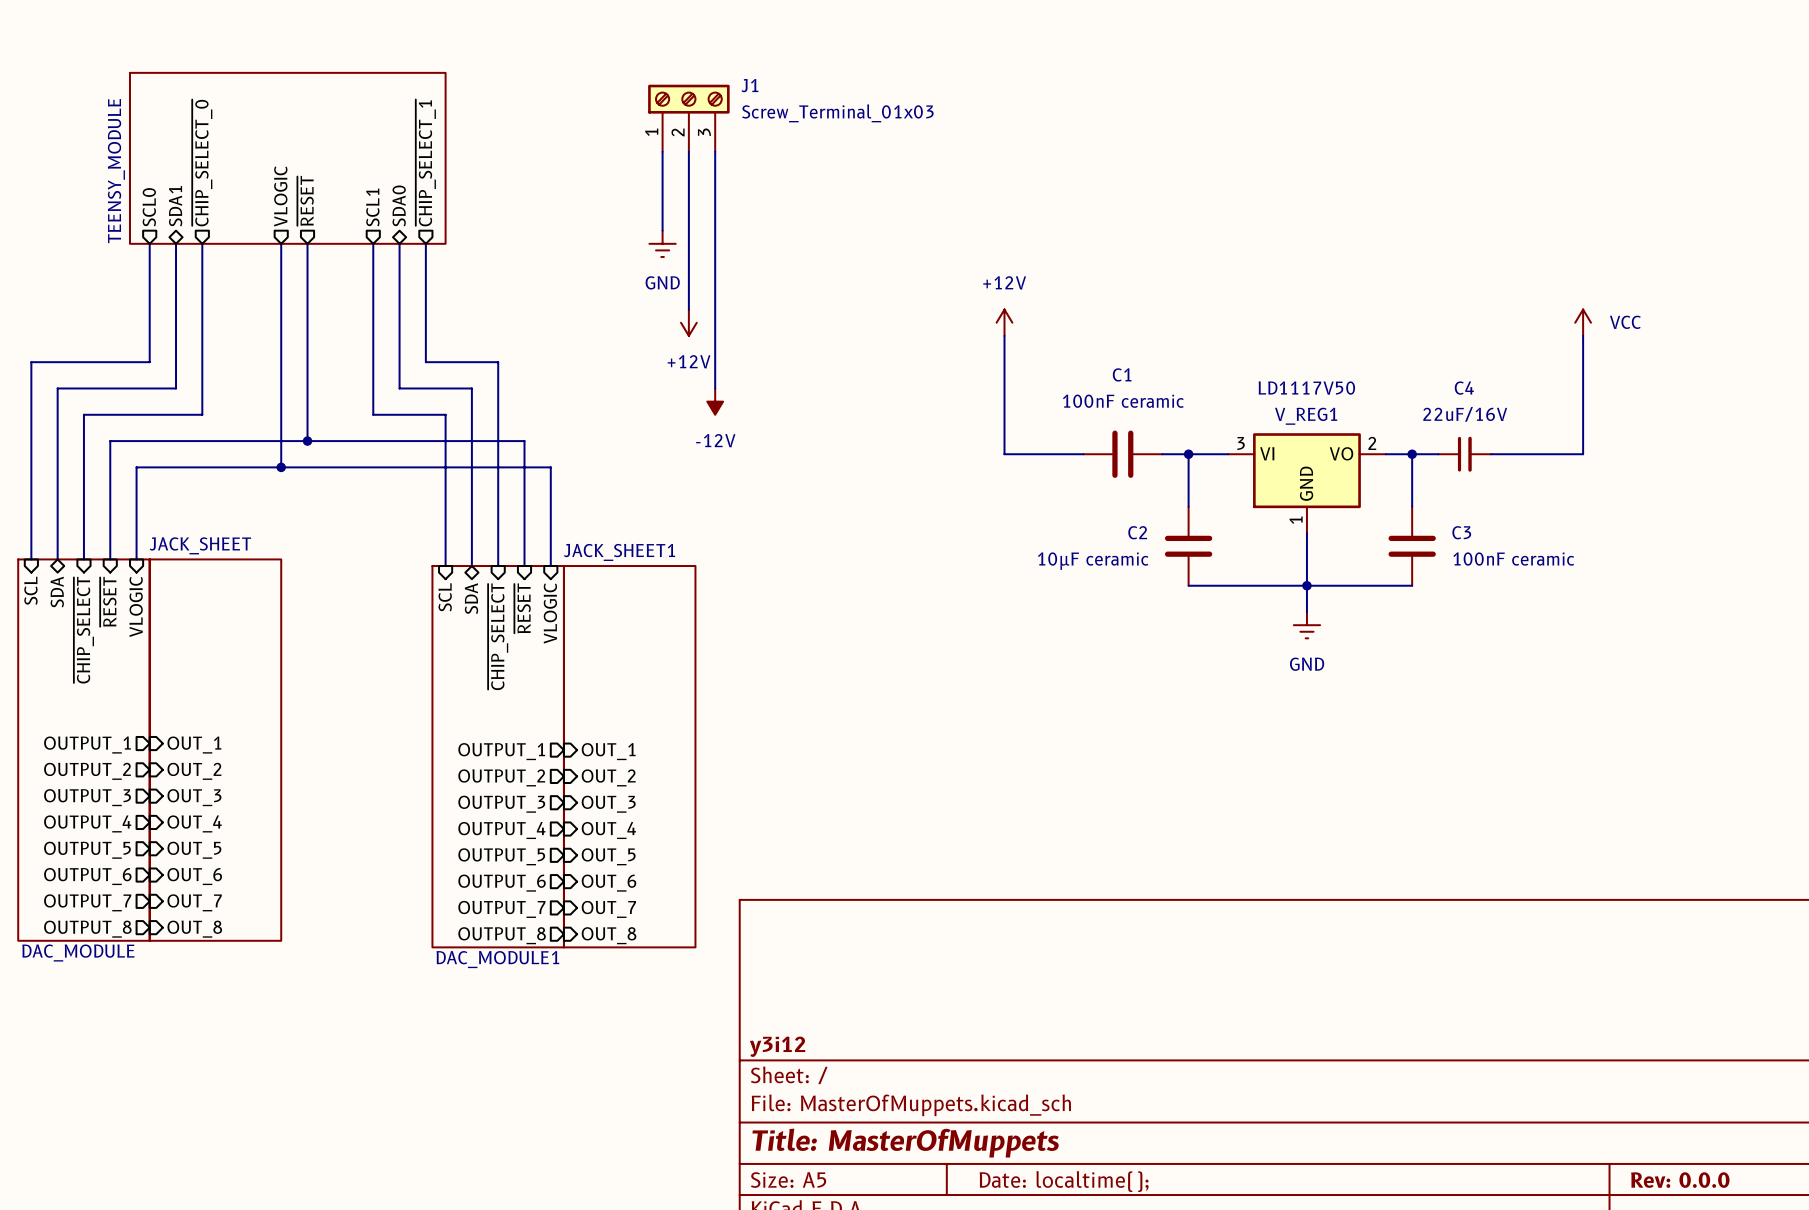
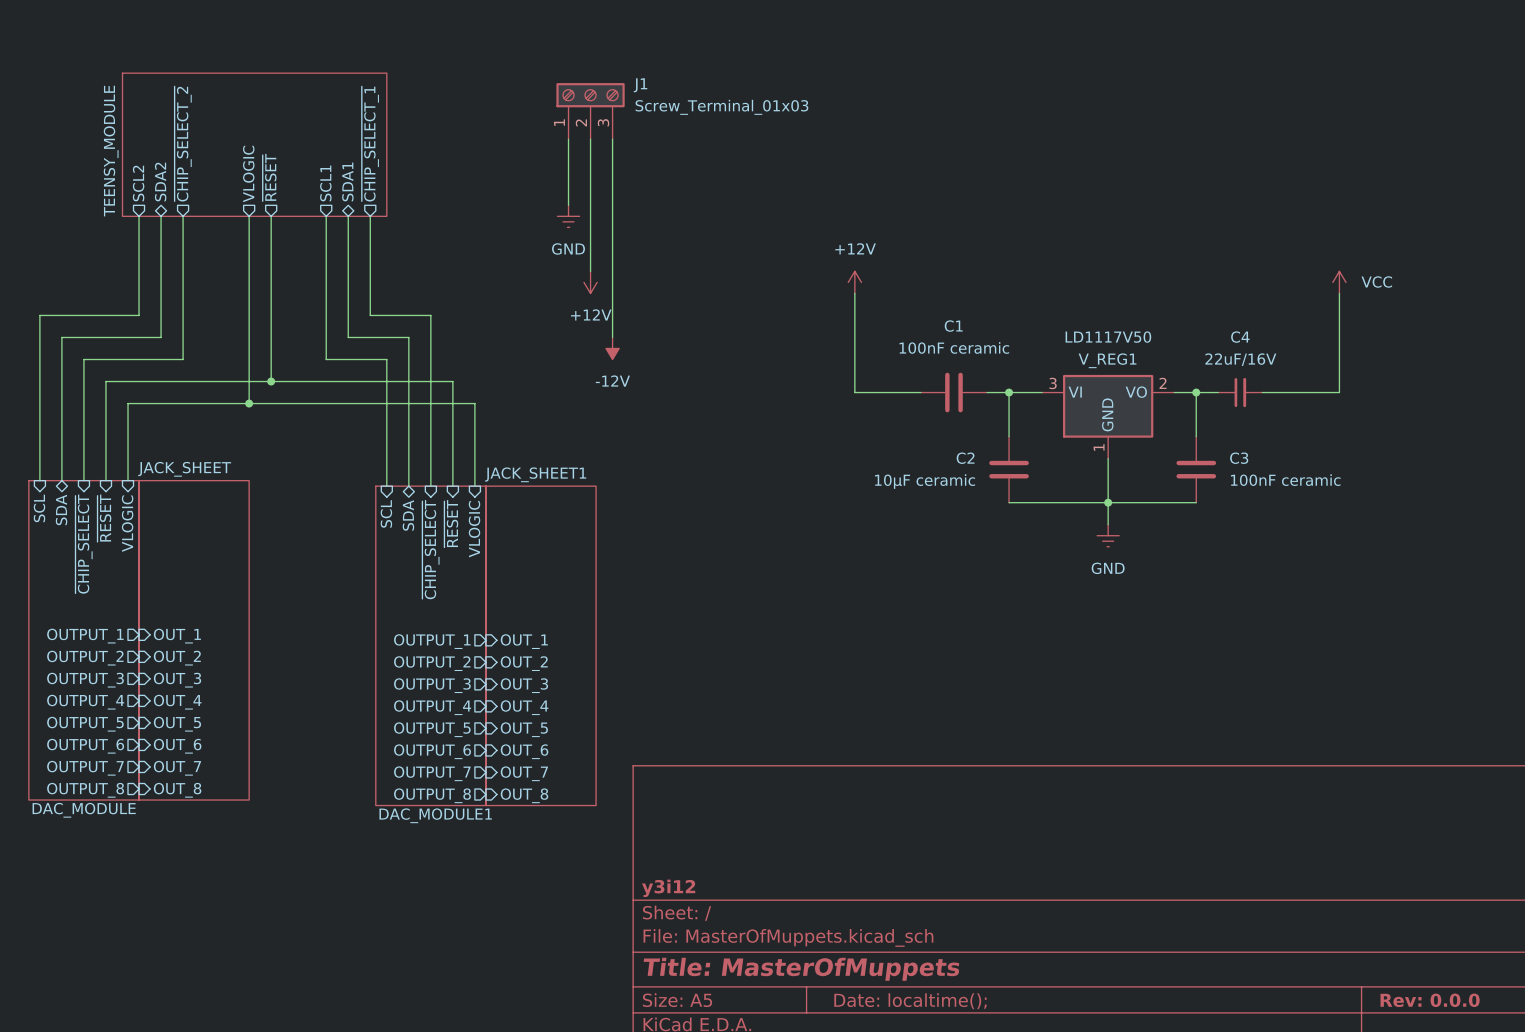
sheet pin: ~{CHIP_SELECT_0} (202, 162) -> ~{CHIP_SELECT_2} (183, 143)
sheet pin: SDA0 (399, 205) -> SDA1 (347, 181)
sheet pin: SDA1 (175, 206) -> SDA2 (160, 182)
sheet pin: SCL0 (149, 207) -> SCL2 (138, 183)

